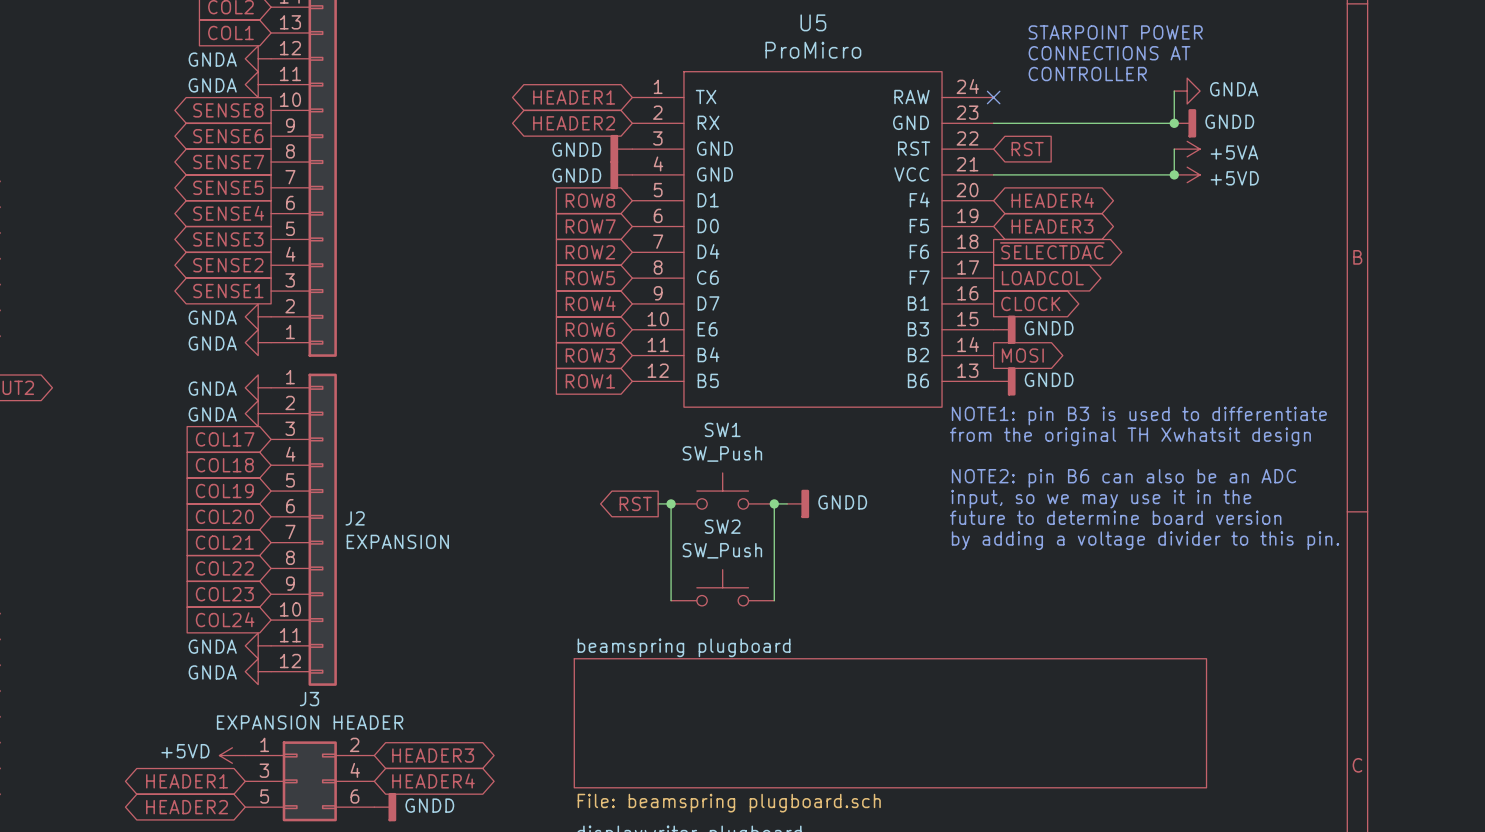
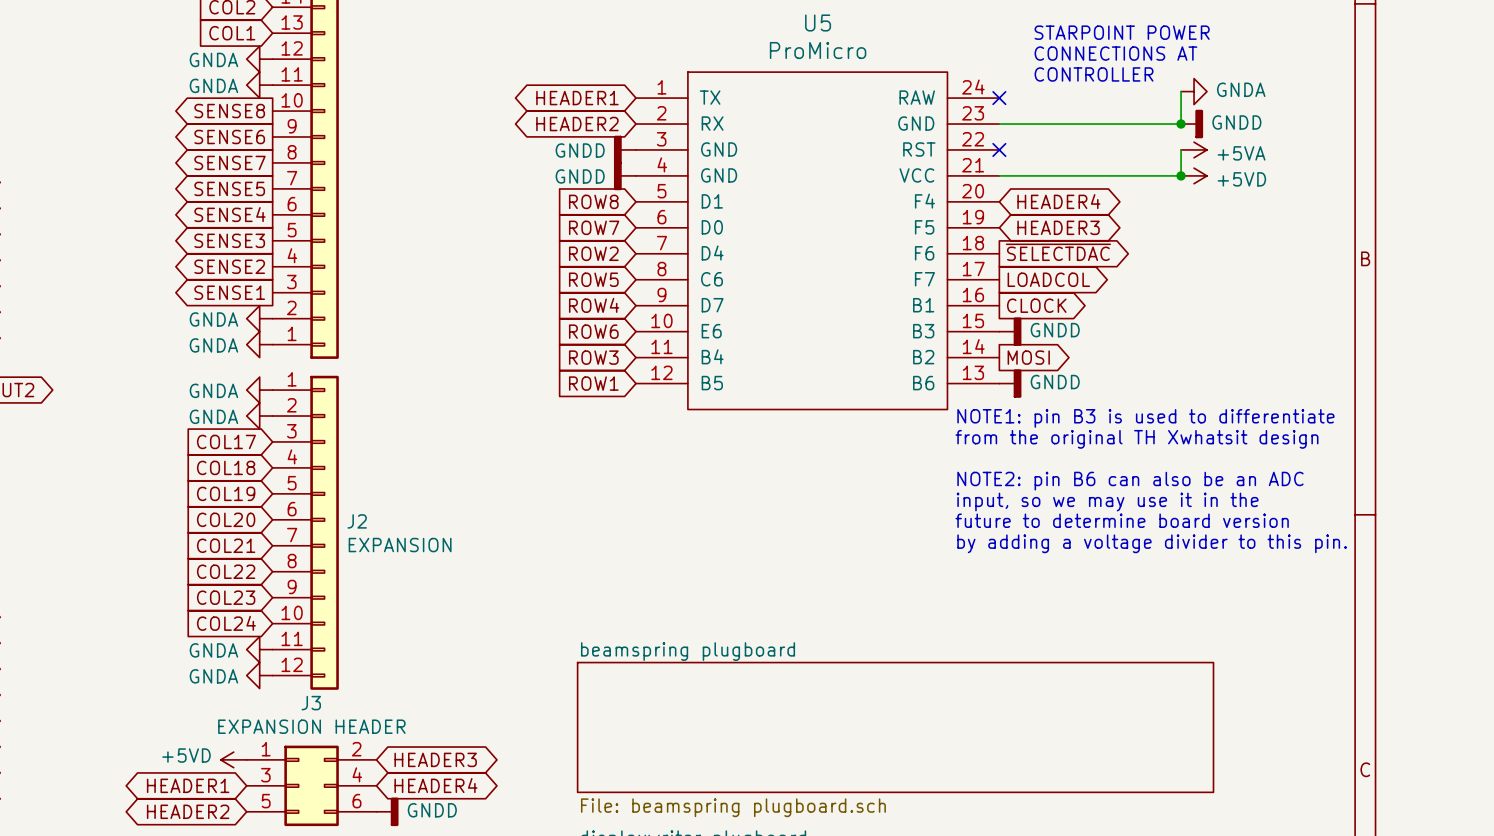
no-connect mark: none -> (999, 149)
global label: RST (1027, 149) -> none
SW1: SW_Push (722, 491) -> none
global label: RST (635, 503) -> none
wire: (658, 503) (671, 503) (671, 600) -> none
junction: (671, 503) -> none
junction: (774, 503) -> none
wire: (787, 503) (774, 503) (774, 600) -> none
power symbol: GNDD (798, 503) -> none
SW2: SW_Push (722, 587) -> none

